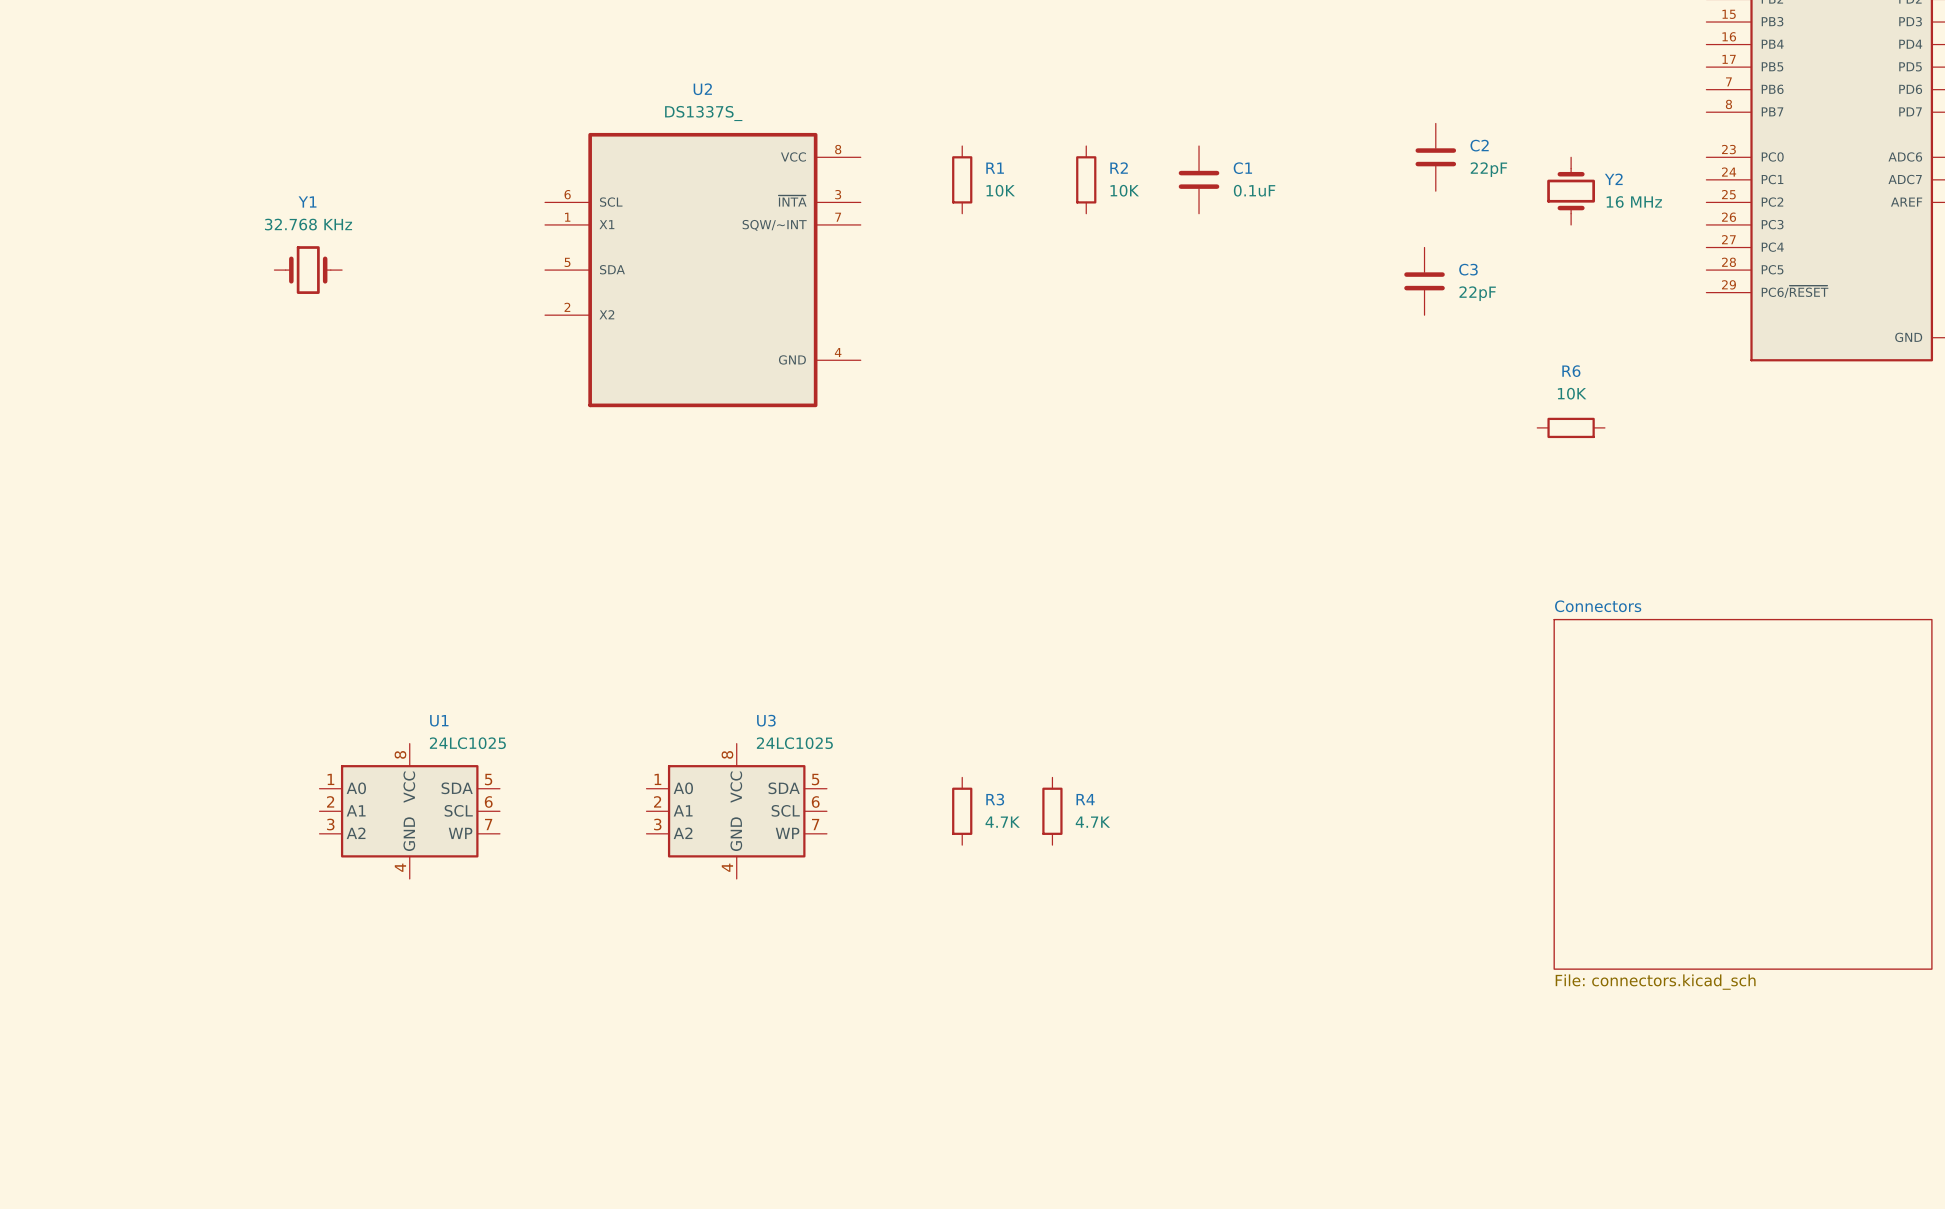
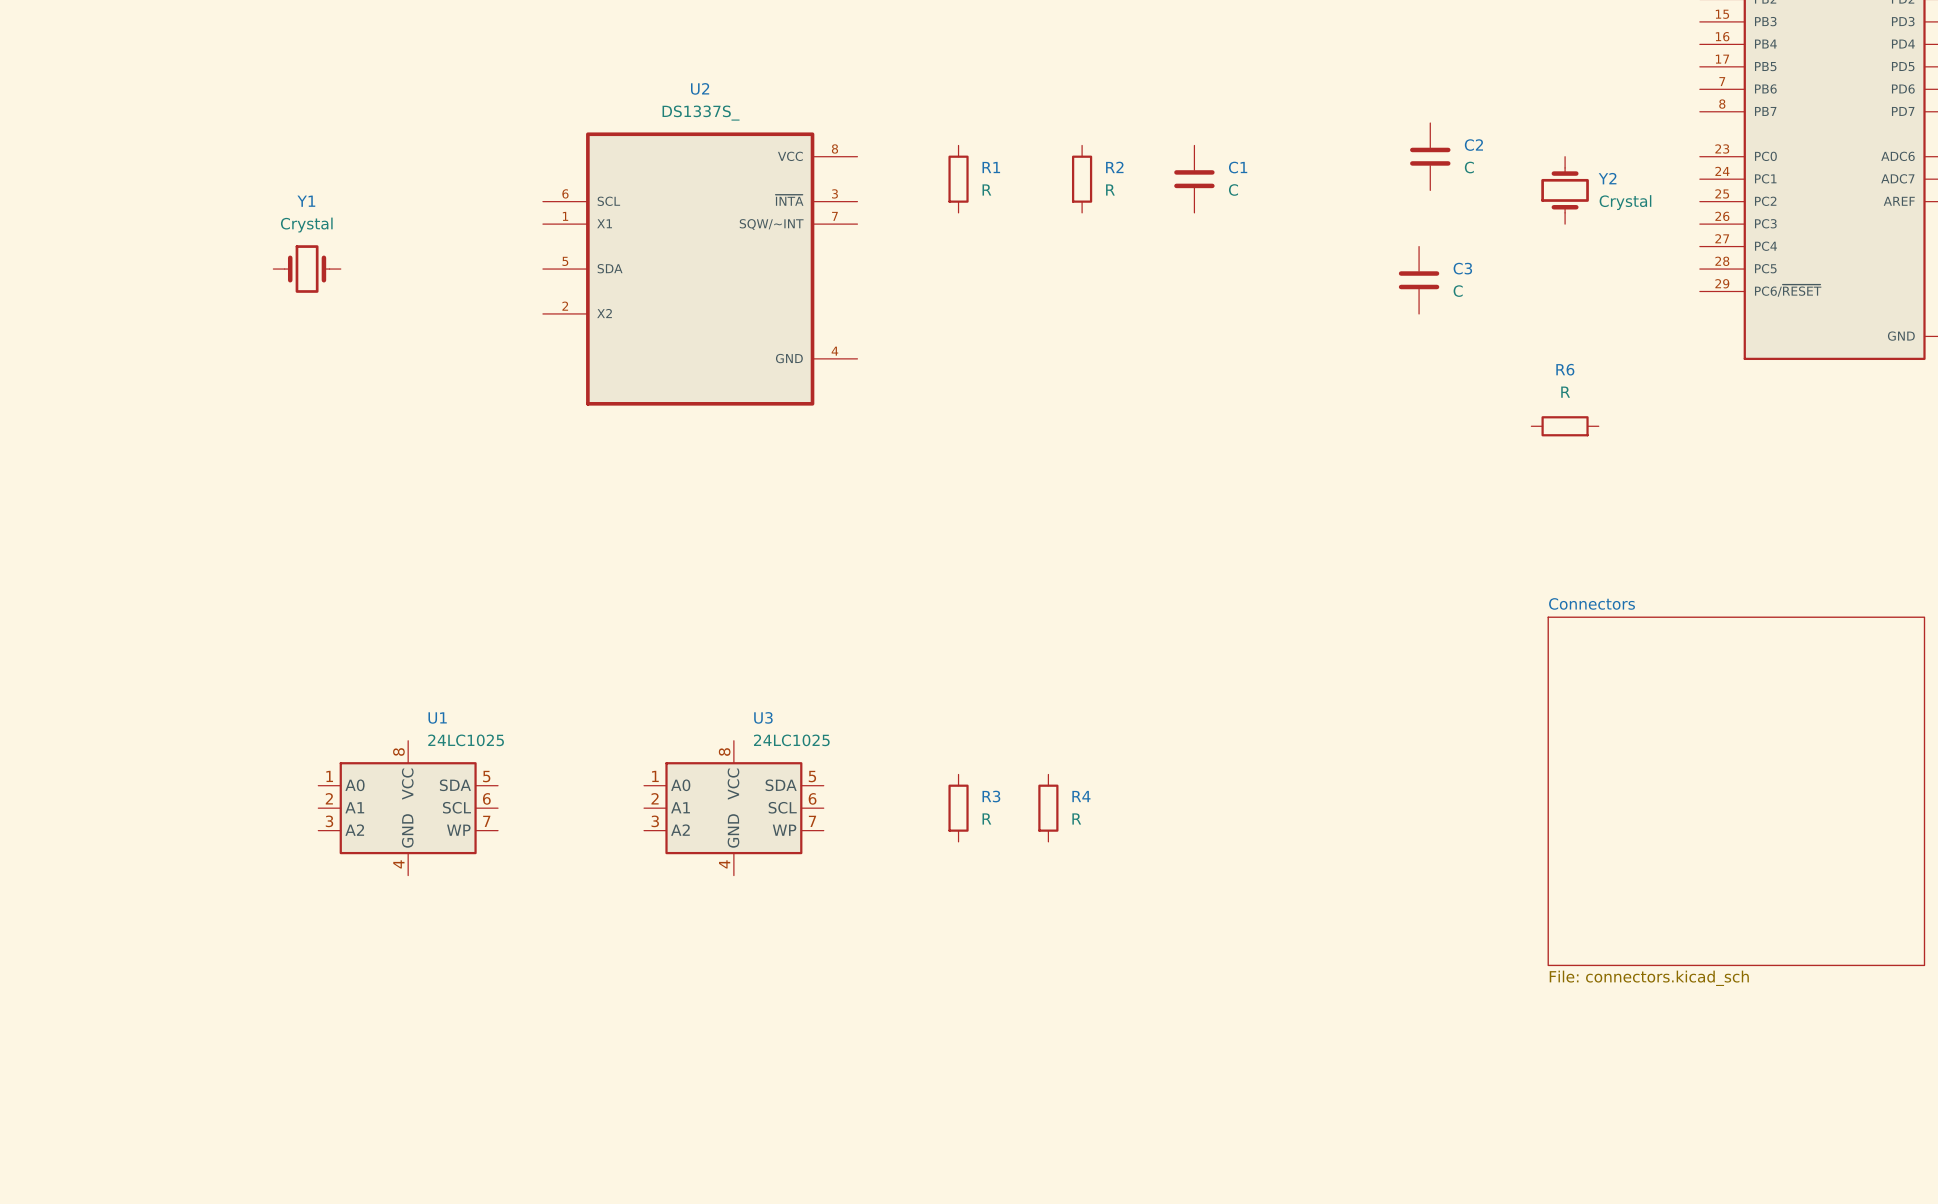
C2 value: 22pF (1488, 169) -> C (1469, 167)
R1 value: 10K (1000, 190) -> R (986, 189)
R2 value: 10K (1124, 190) -> R (1110, 189)
C1 value: 0.1uF (1254, 190) -> C (1233, 189)
Y2 value: 16 MHz (1634, 201) -> Crystal (1625, 202)
Y1 value: 32.768 KHz (308, 224) -> Crystal (306, 225)
C3 value: 22pF (1477, 293) -> C (1458, 291)
R6 value: 10K (1572, 393) -> R (1565, 392)
R3 value: 4.7K (1002, 822) -> R (986, 818)
R4 value: 4.7K (1092, 822) -> R (1076, 818)

